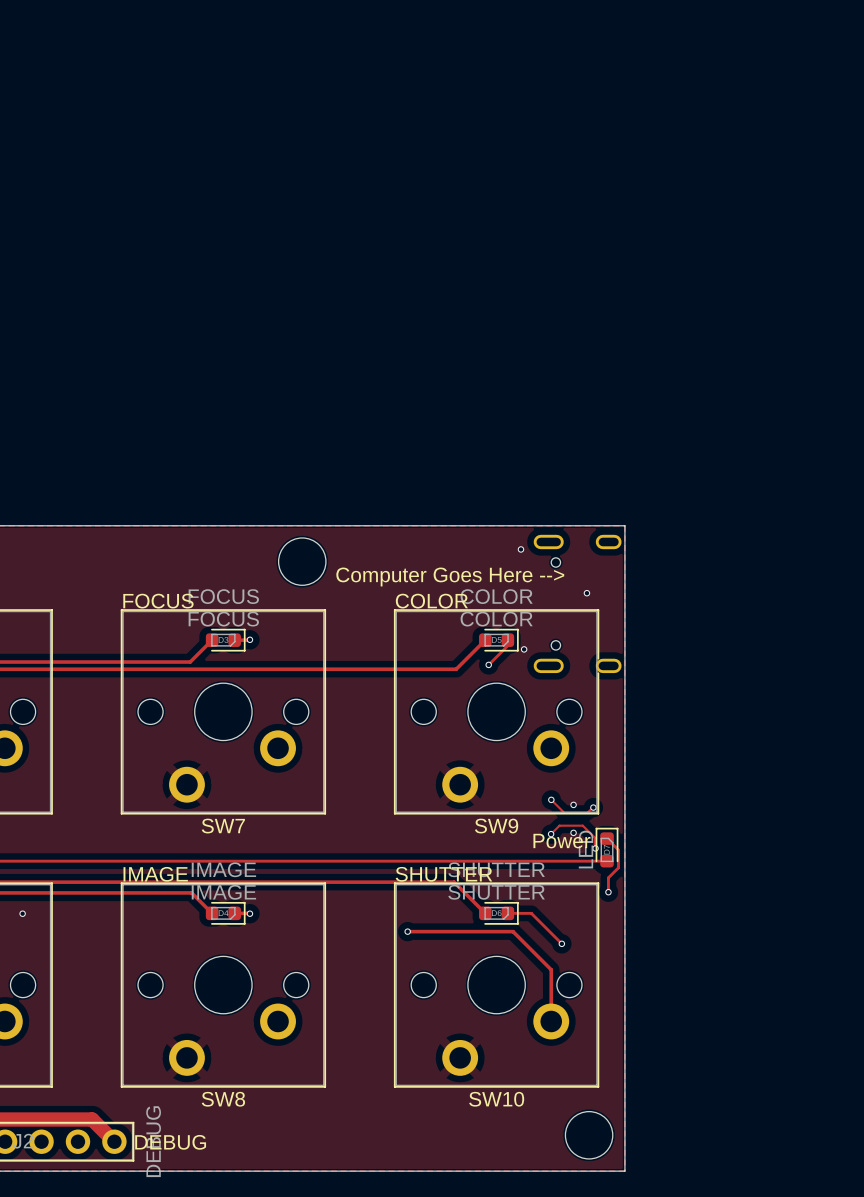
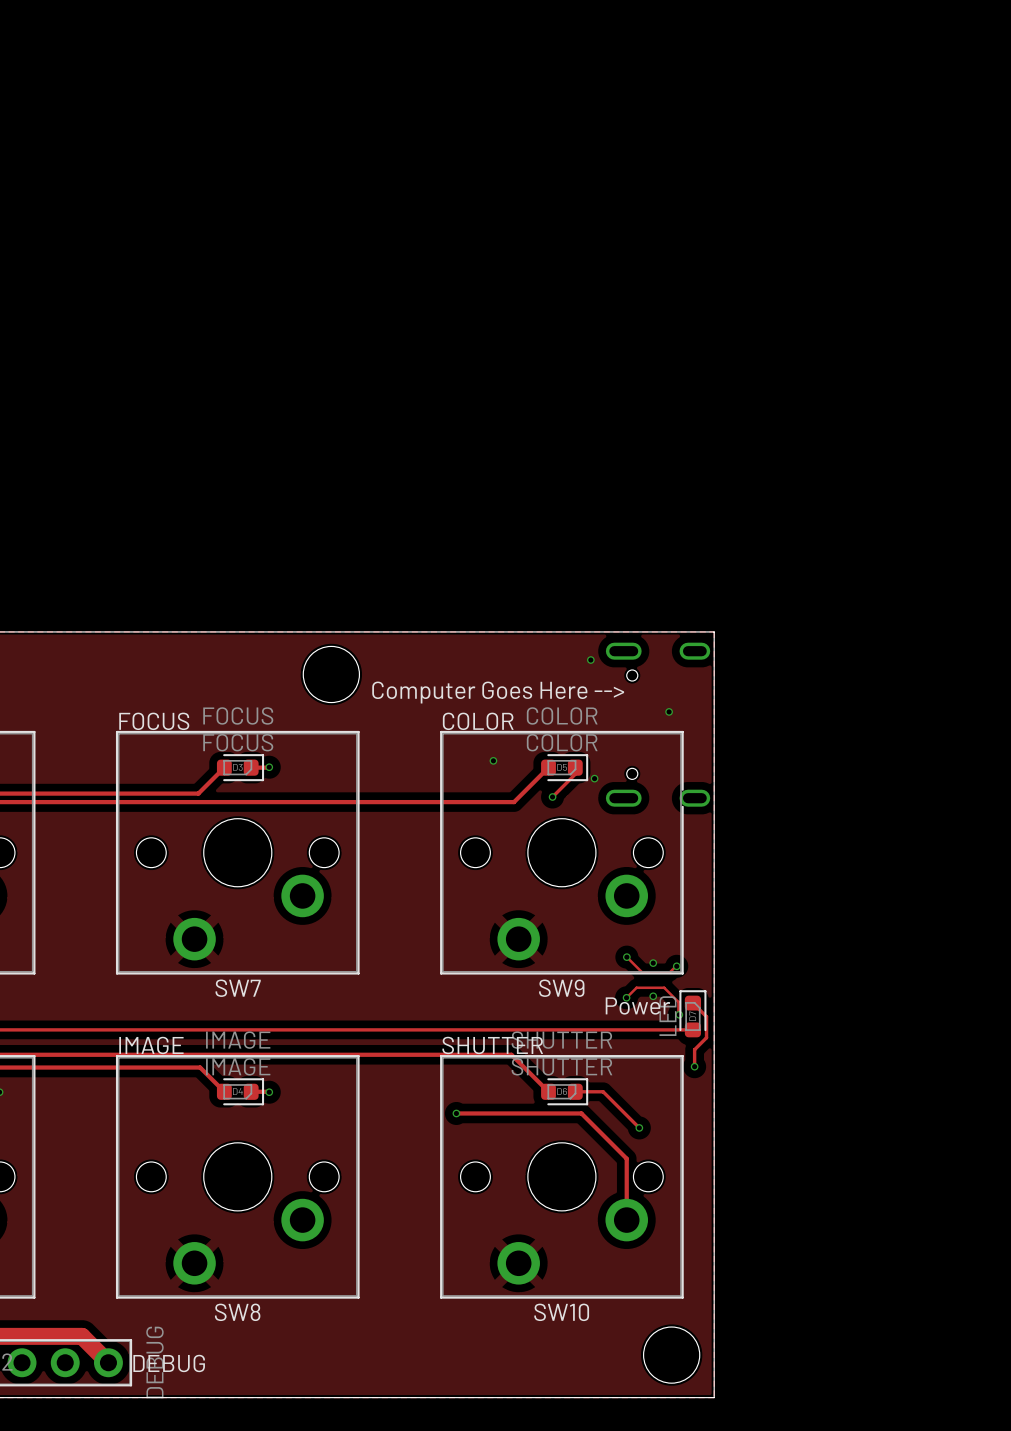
via: none -> (493, 760)

